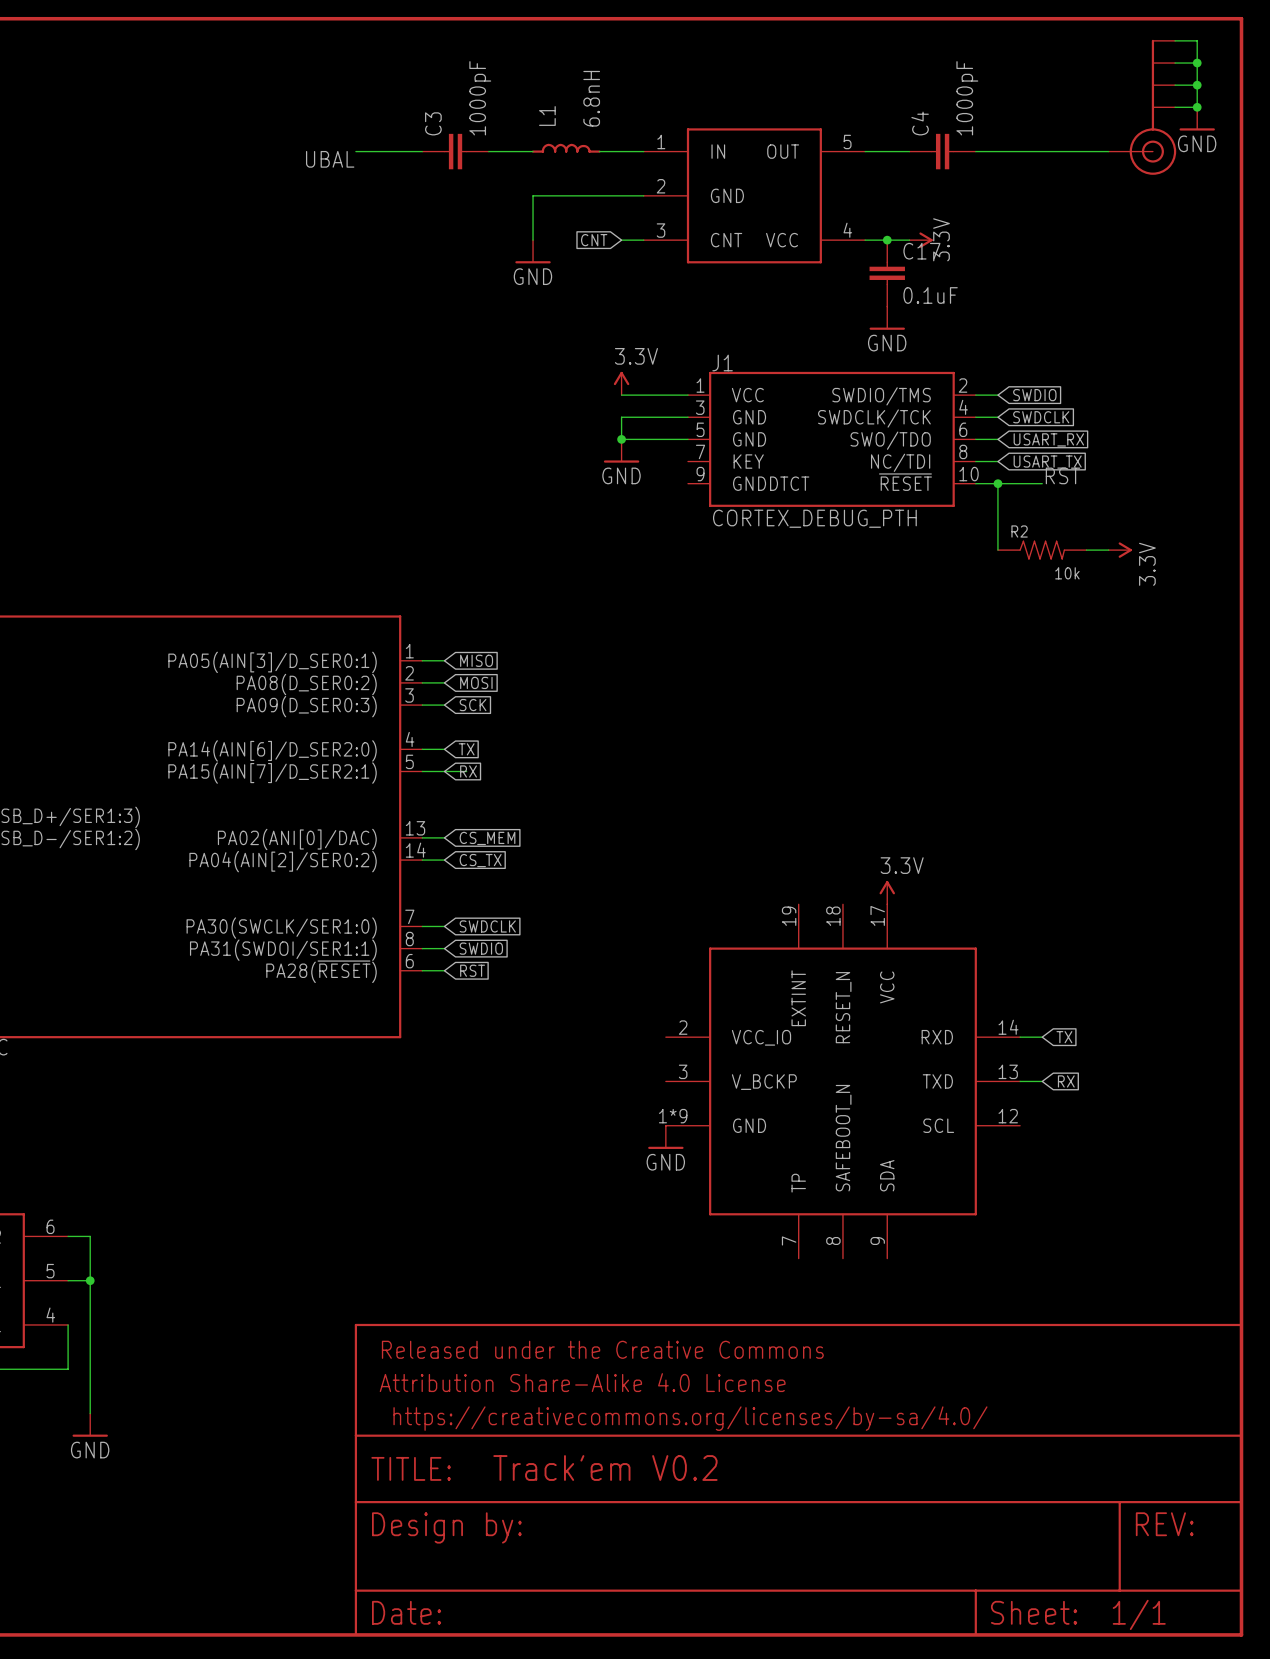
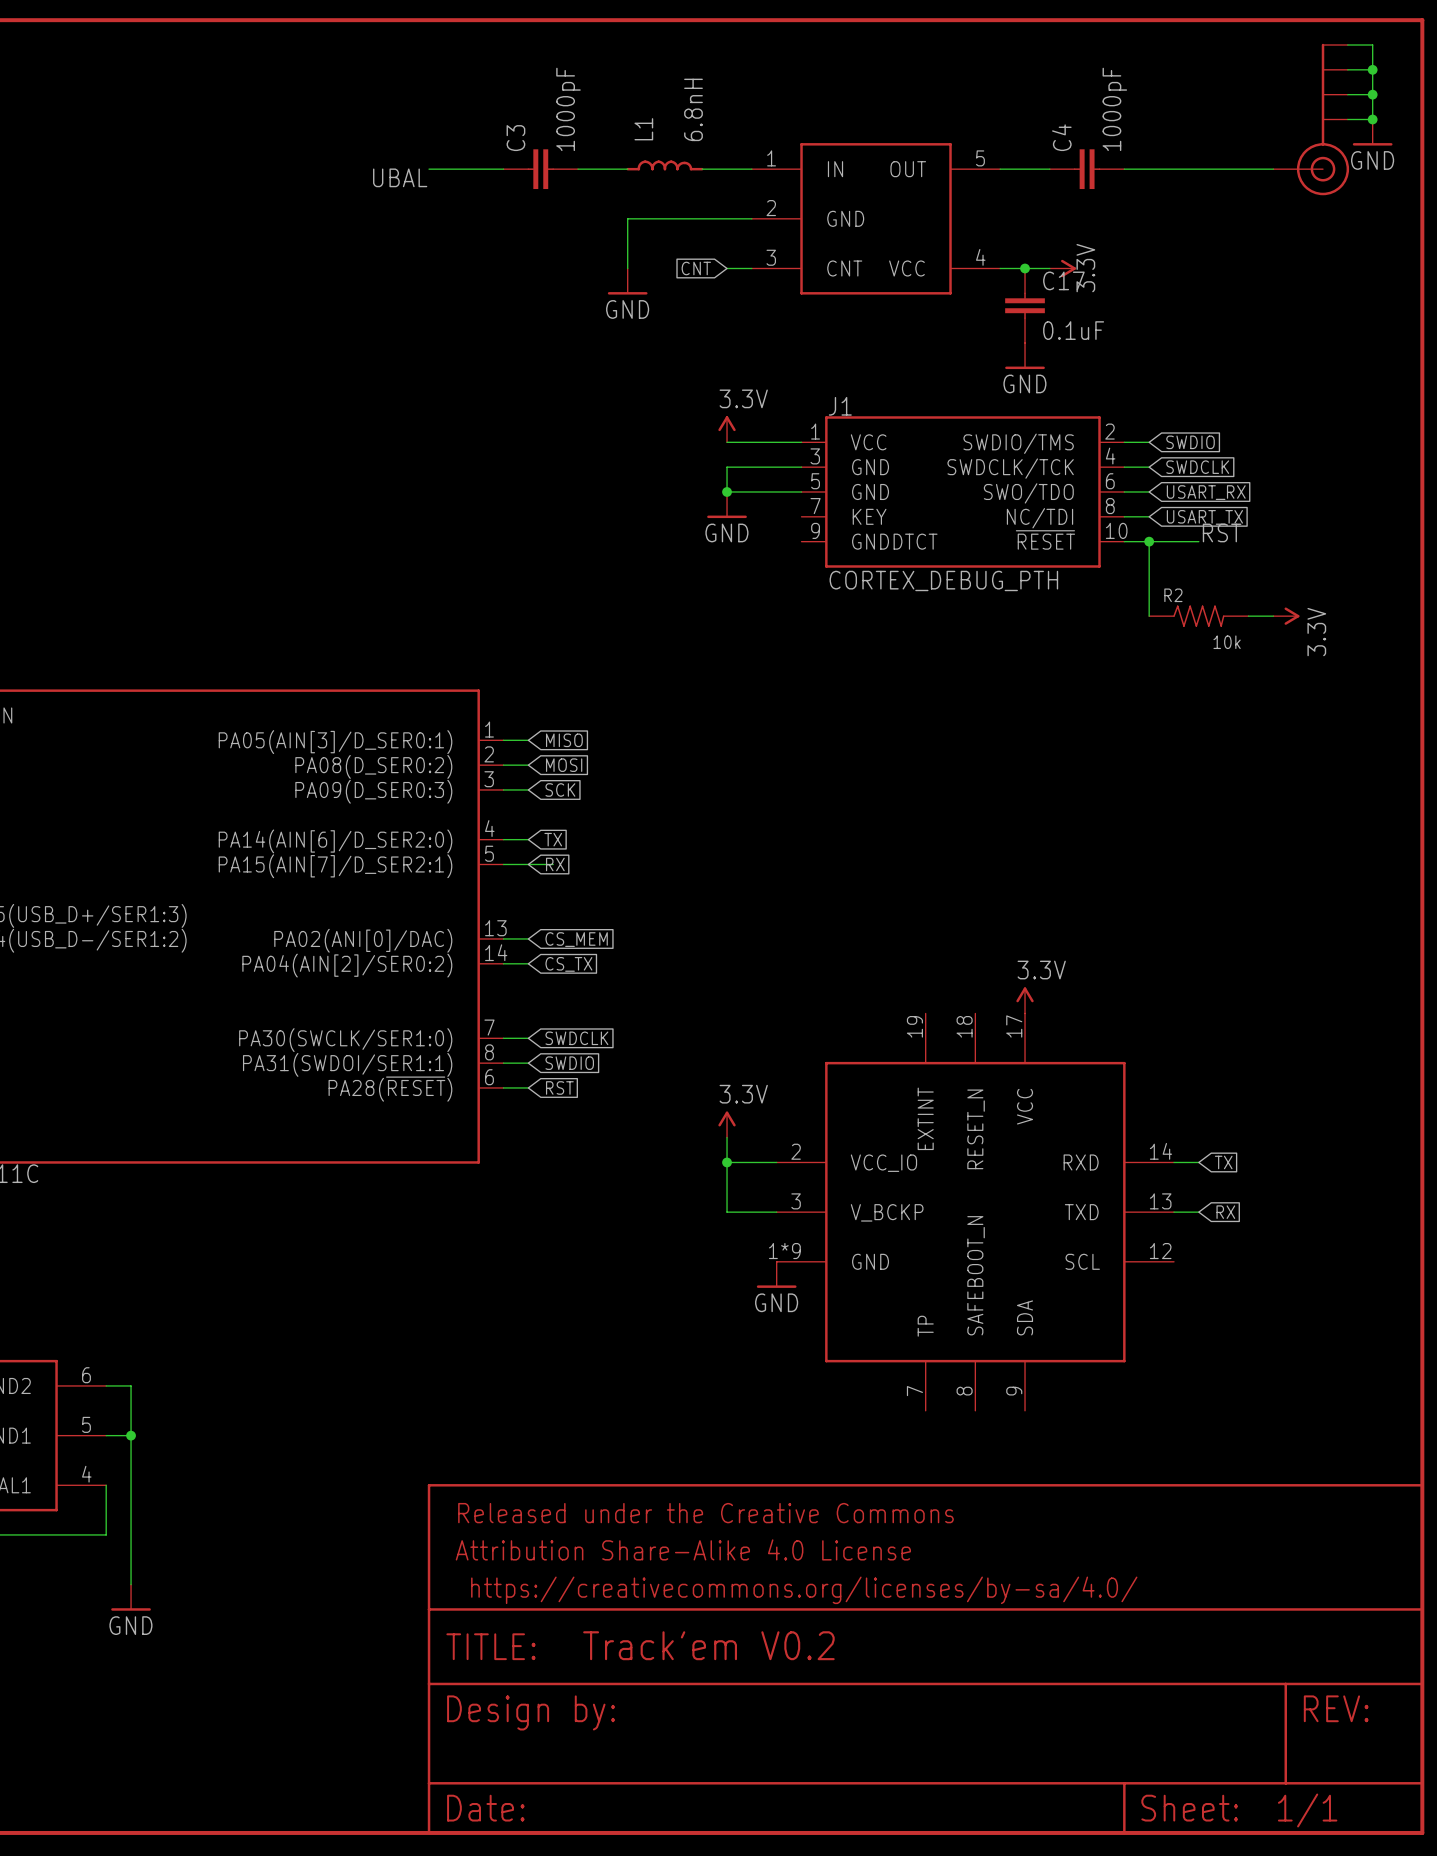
power symbol: none -> 3.3V (727, 1124)
wire: none -> (727, 1137) (727, 1212) (776, 1212)
wire: none -> (727, 1162) (776, 1162)
junction: none -> (727, 1162)

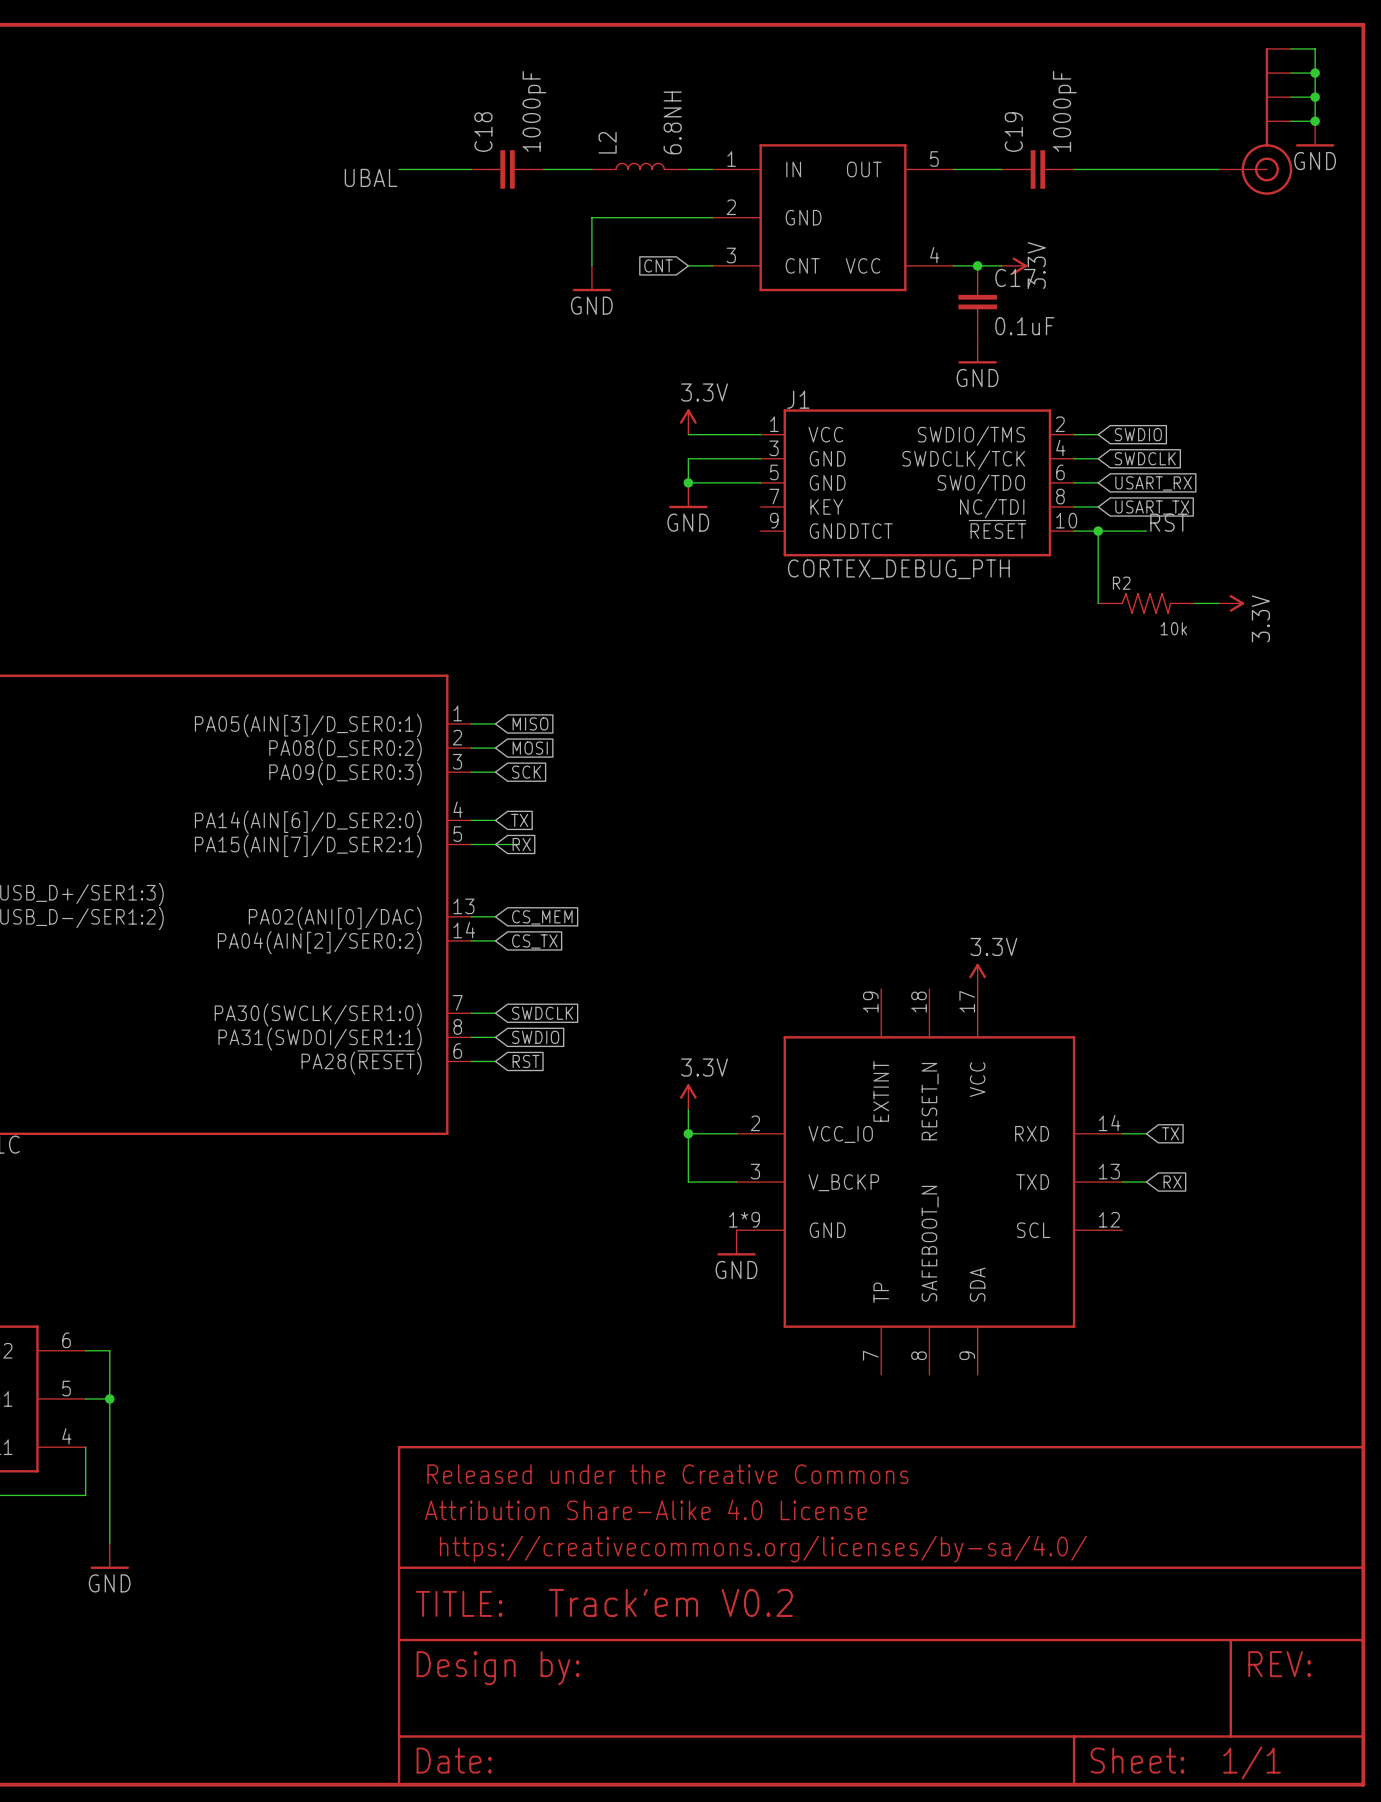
C4 name: C4 (1061, 137) -> C19 (1013, 132)
C3 name: C3 (515, 138) -> C18 (483, 132)
L1: 6.8nH (664, 165) -> none
L2: none -> 6.8NH (640, 166)

